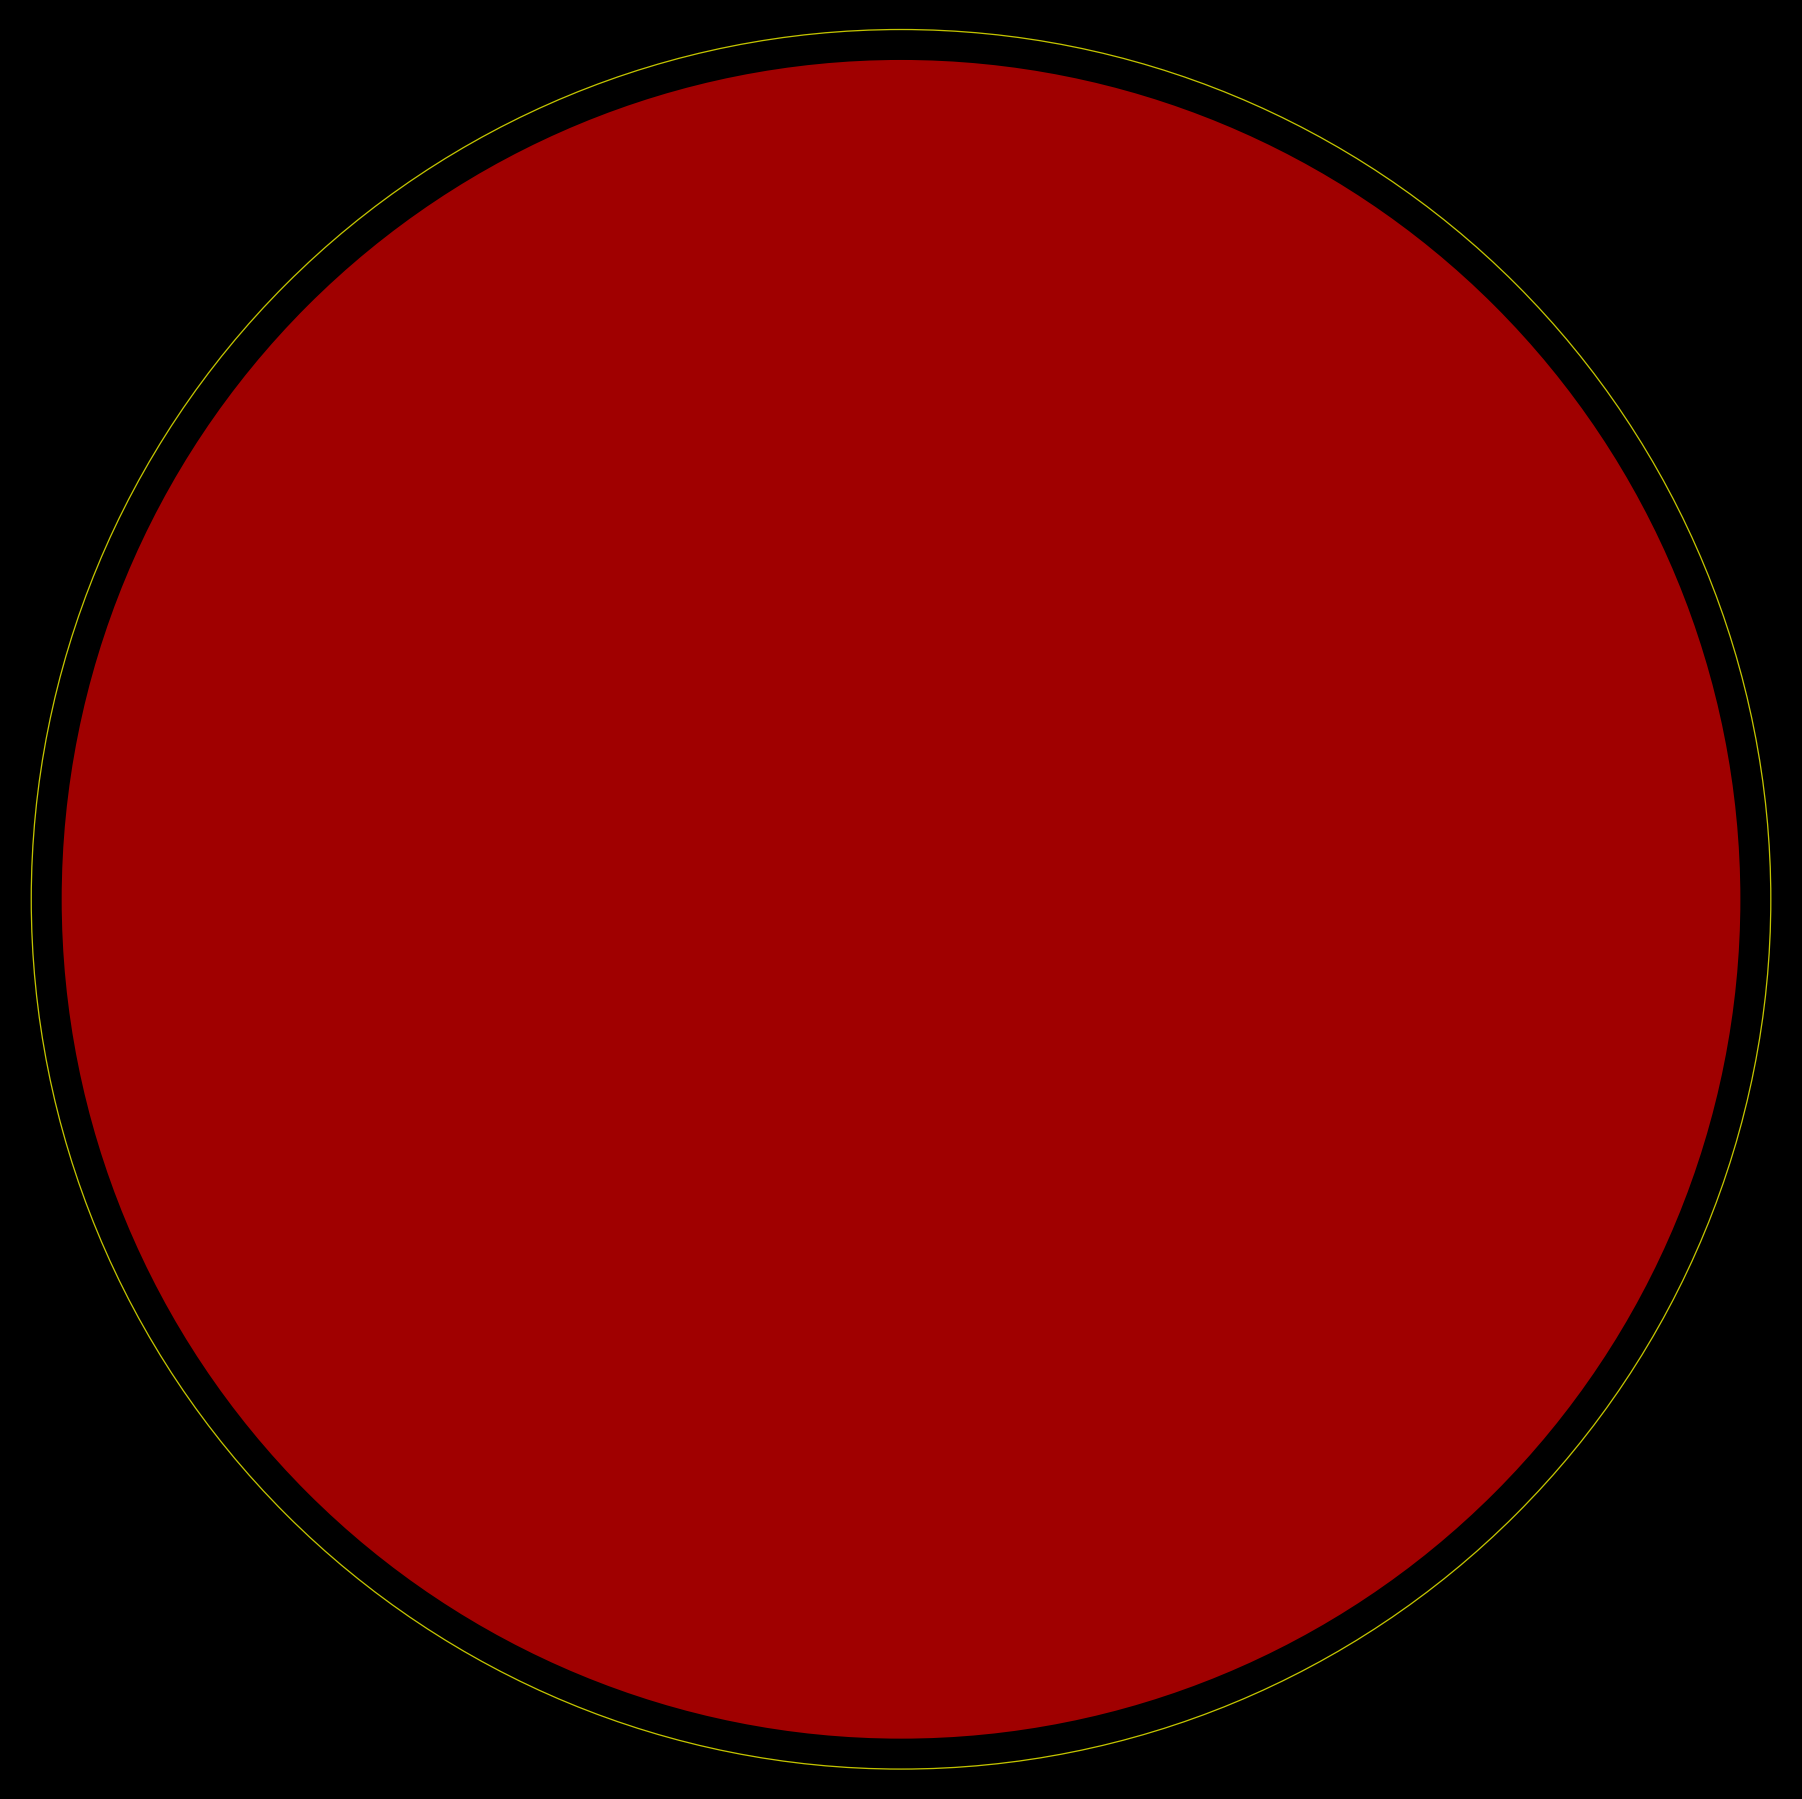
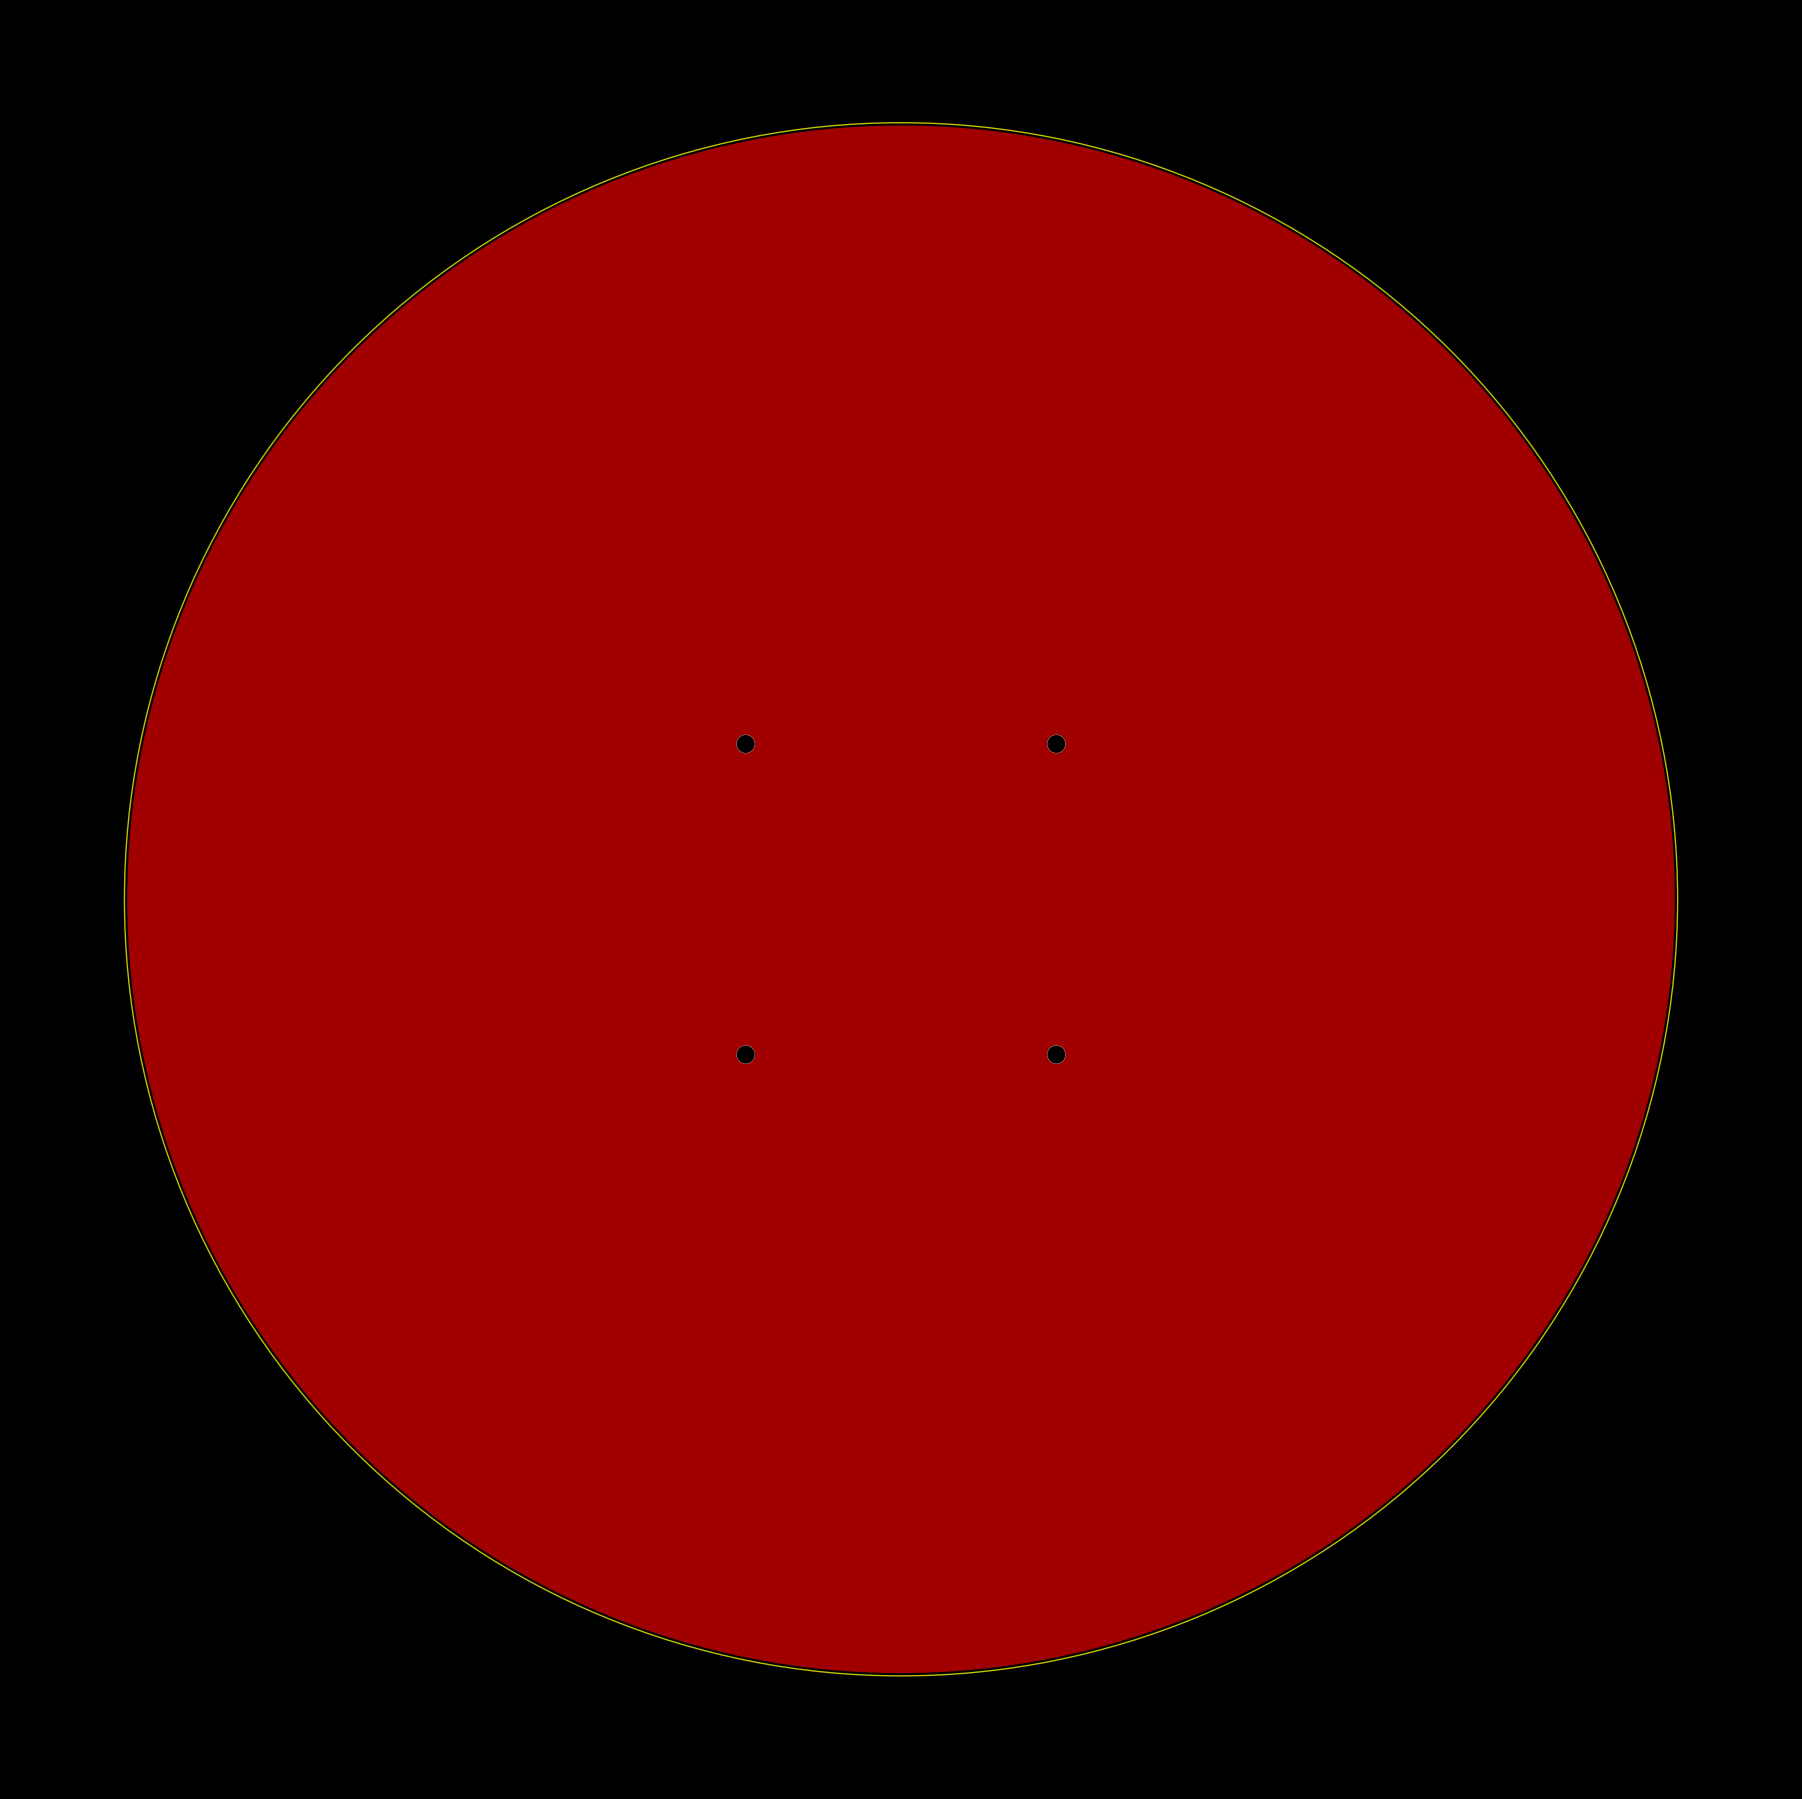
round board edge size: [31, 29, 1771, 1770] -> [124, 122, 1678, 1677]
drawing shape: [61, 59, 1741, 1739] -> [127, 125, 1675, 1674]
via: none -> (745, 743)
via: none -> (1056, 743)
via: none -> (745, 1054)
via: none -> (1056, 1054)

